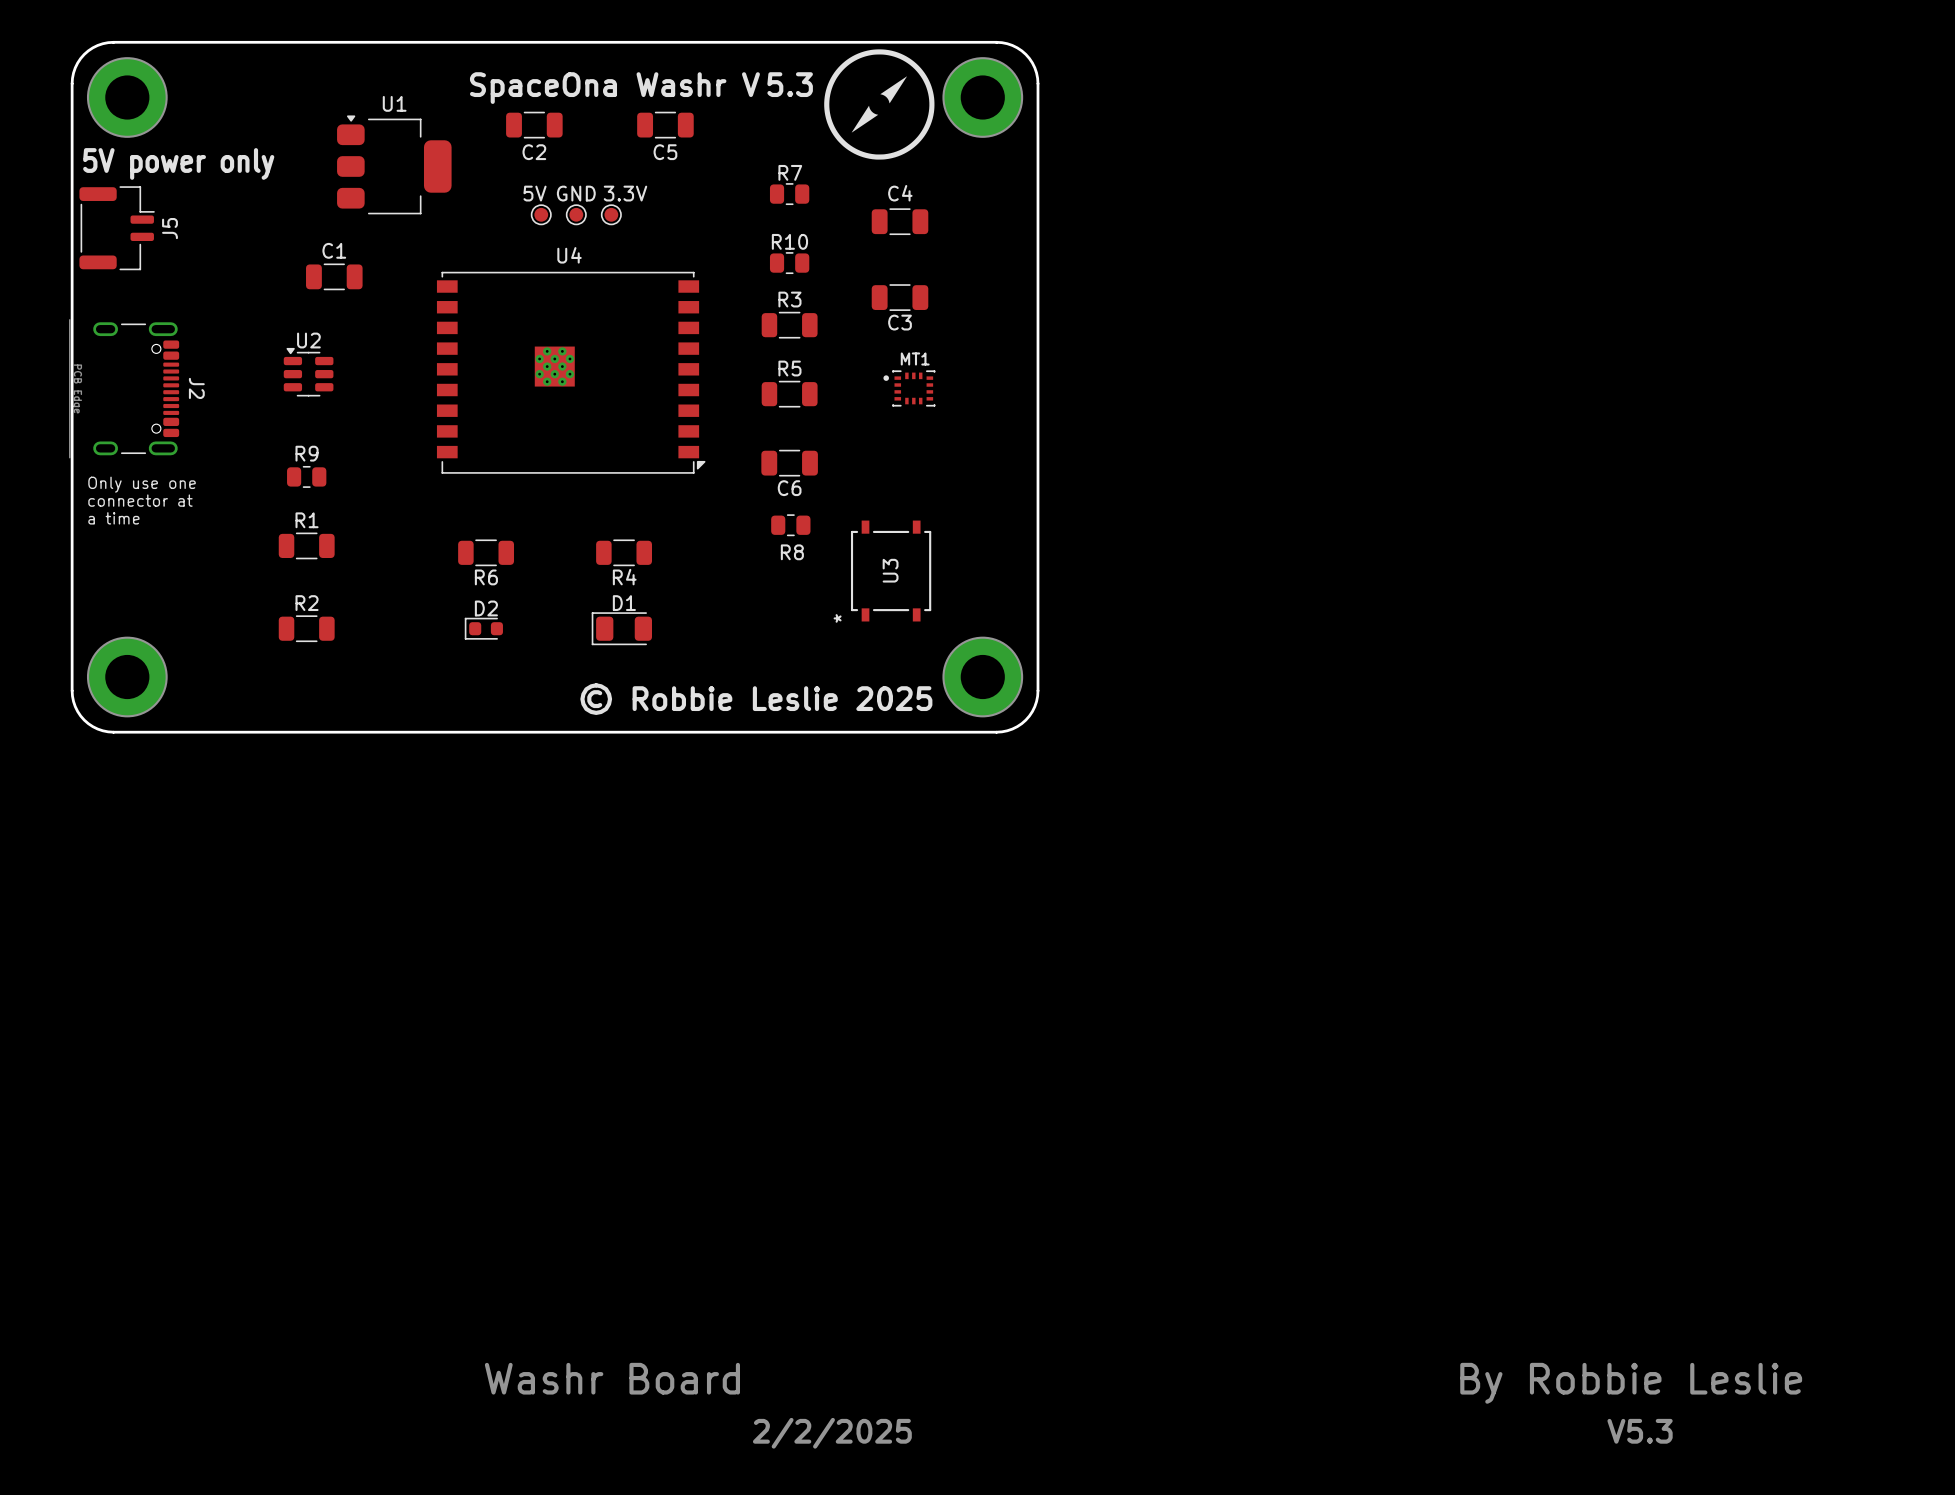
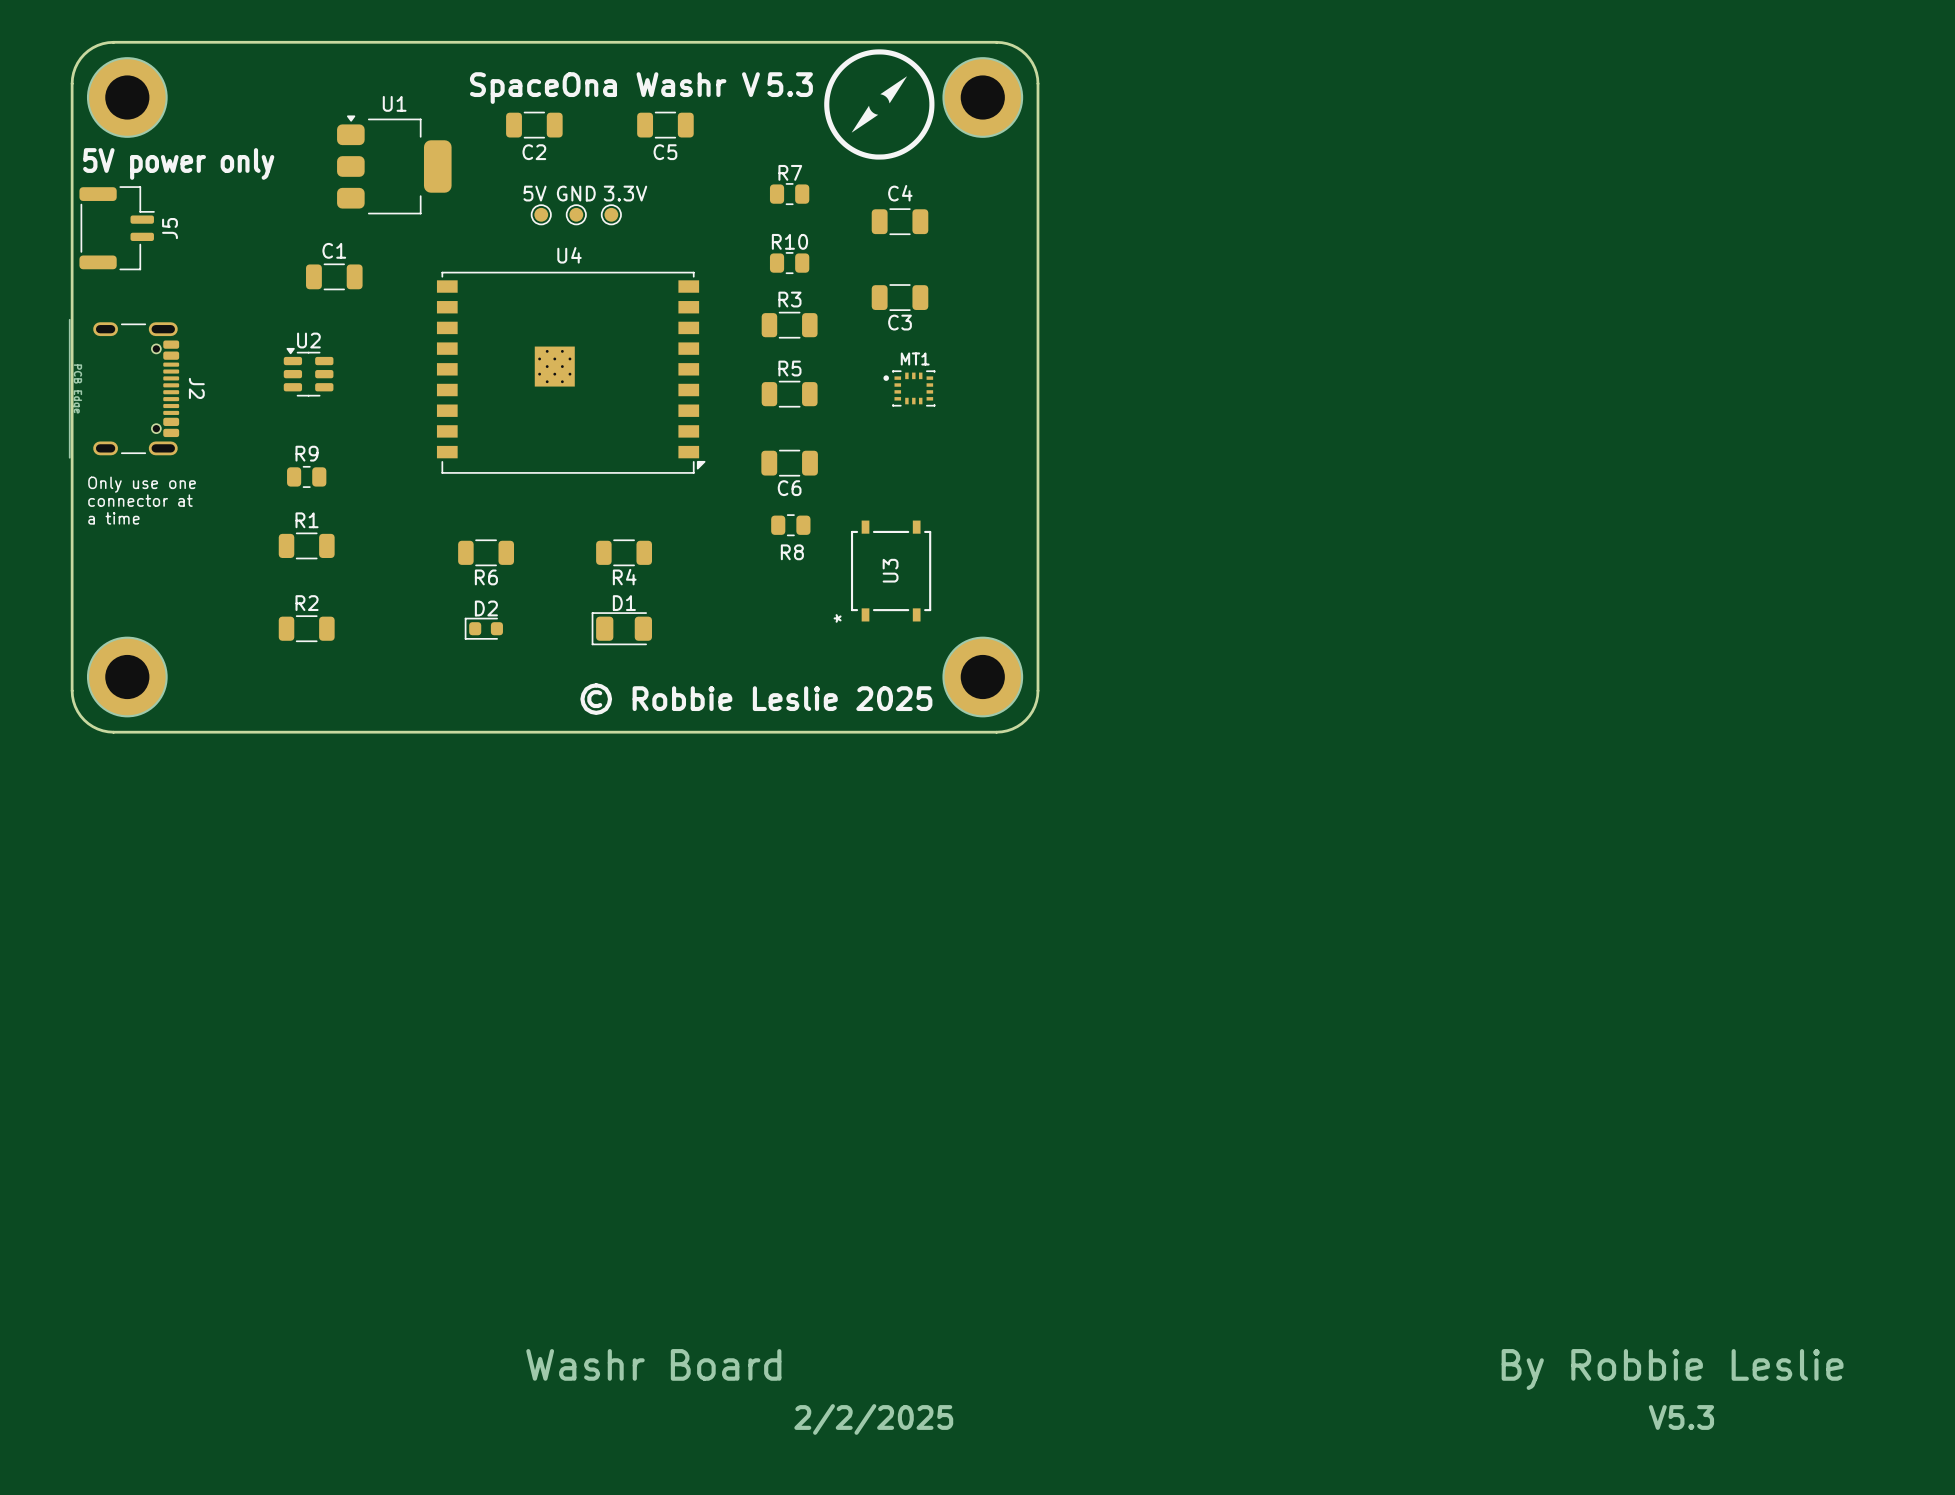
text position: Washr Board (612, 1378) -> Washr Board (653, 1364)
text position: By Robbie Leslie (1631, 1383) -> By Robbie Leslie (1672, 1369)
text position: V5.3 (1640, 1431) -> V5.3 (1681, 1417)
text position: 2/2/2025 (832, 1433) -> 2/2/2025 (873, 1419)

